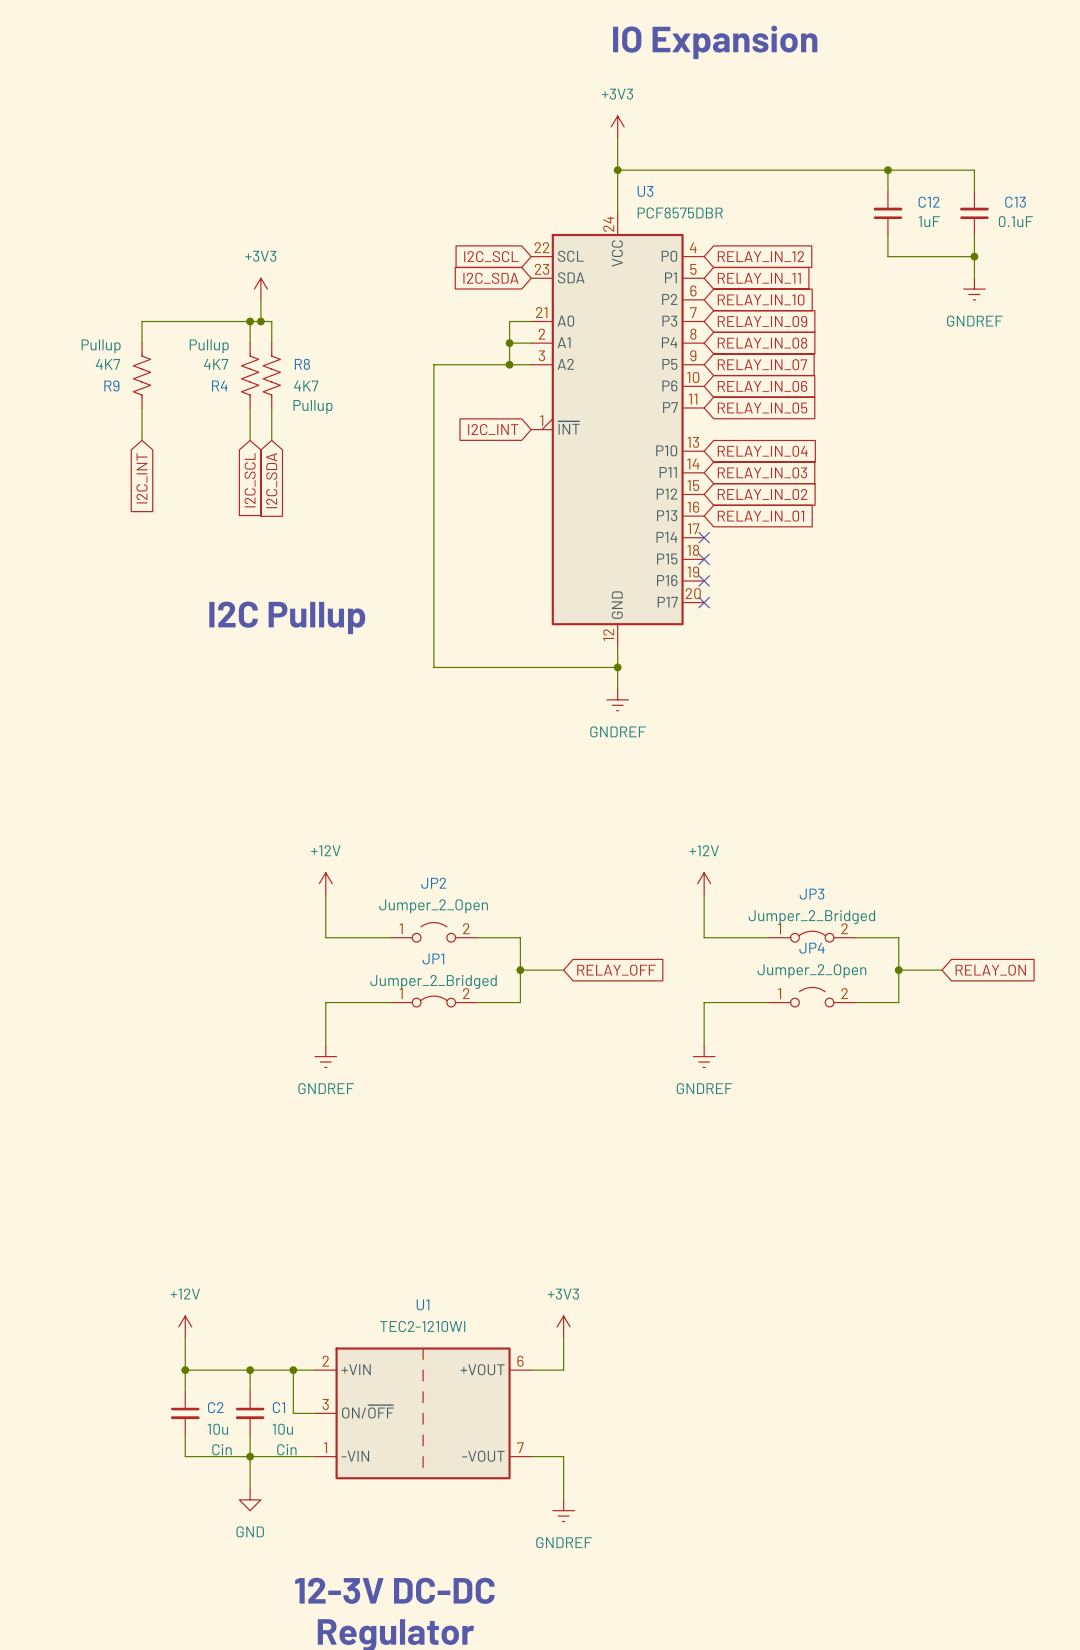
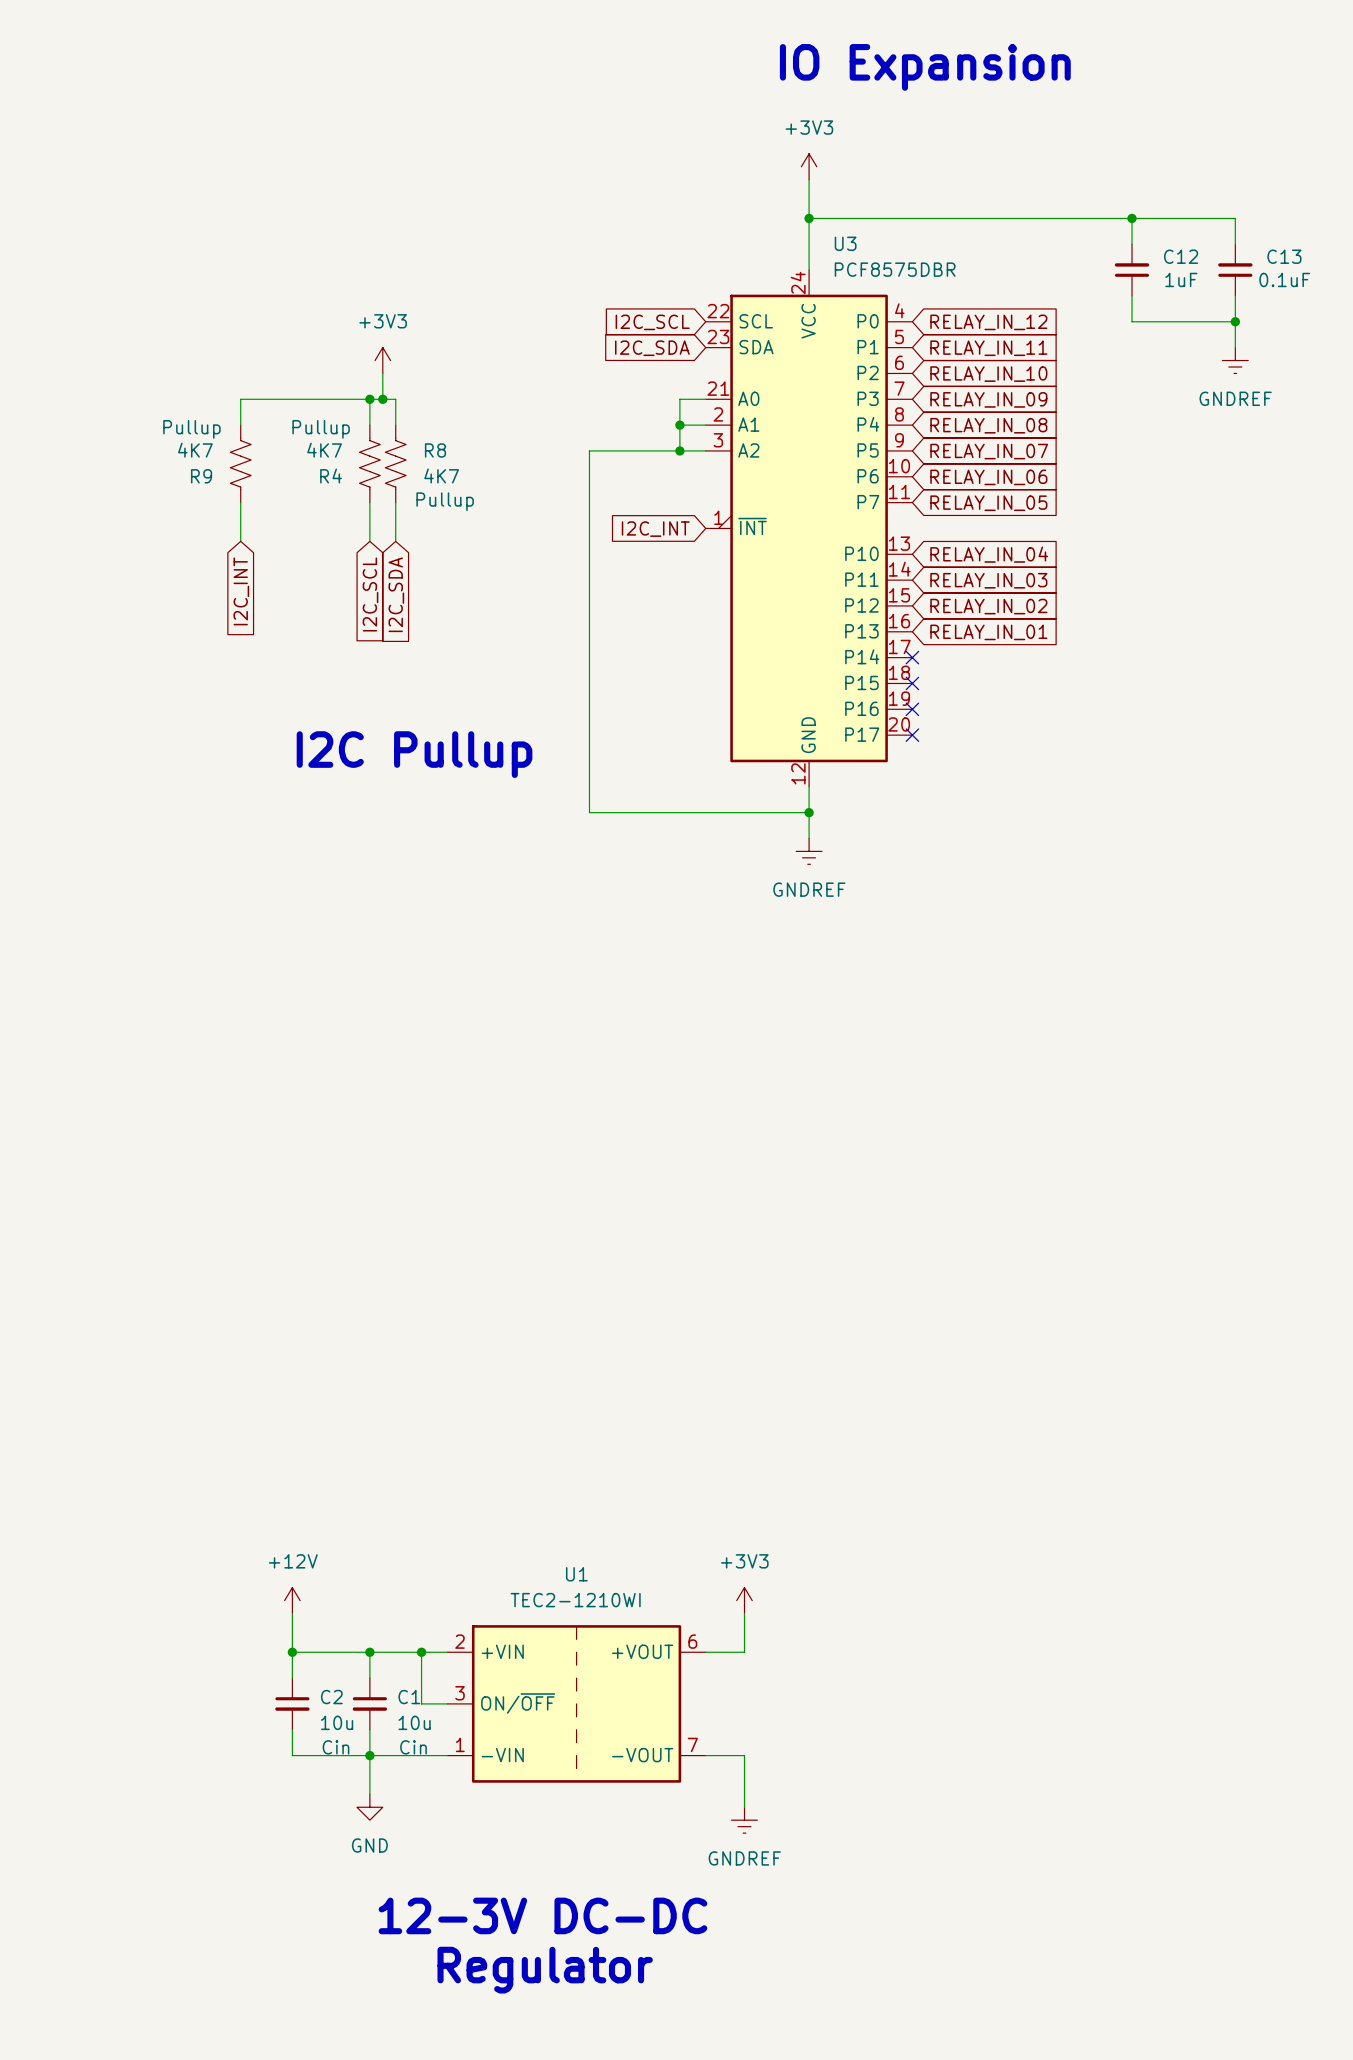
power symbol: +12V (325, 883) -> none
power symbol: +12V (704, 883) -> none
wire: (325, 894) (325, 937) (390, 937) -> none
wire: (704, 894) (704, 937) (769, 937) -> none
JP2: Jumper_2_Open (433, 932) -> none
JP3: Jumper_2_Bridged (812, 936) -> none
wire: (477, 937) (520, 937) (520, 1002) (477, 1002) -> none
wire: (855, 937) (898, 937) (898, 1002) (855, 1002) -> none
wire: (520, 970) (563, 970) -> none
junction: (520, 970) -> none
global label: RELAY_OFF (616, 970) -> none
wire: (898, 970) (941, 970) -> none
junction: (898, 970) -> none
global label: RELAY_ON (990, 970) -> none
JP4: Jumper_2_Open (812, 997) -> none
JP1: Jumper_2_Bridged (433, 1001) -> none
wire: (390, 1002) (325, 1002) (325, 1045) -> none
wire: (769, 1002) (704, 1002) (704, 1045) -> none
power symbol: GNDREF (325, 1056) -> none
power symbol: GNDREF (704, 1056) -> none

